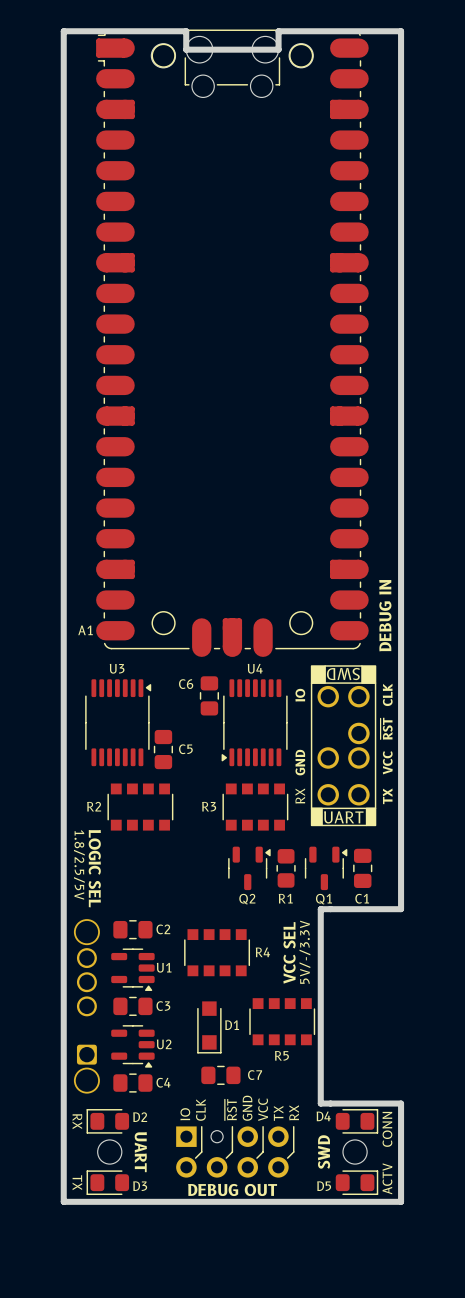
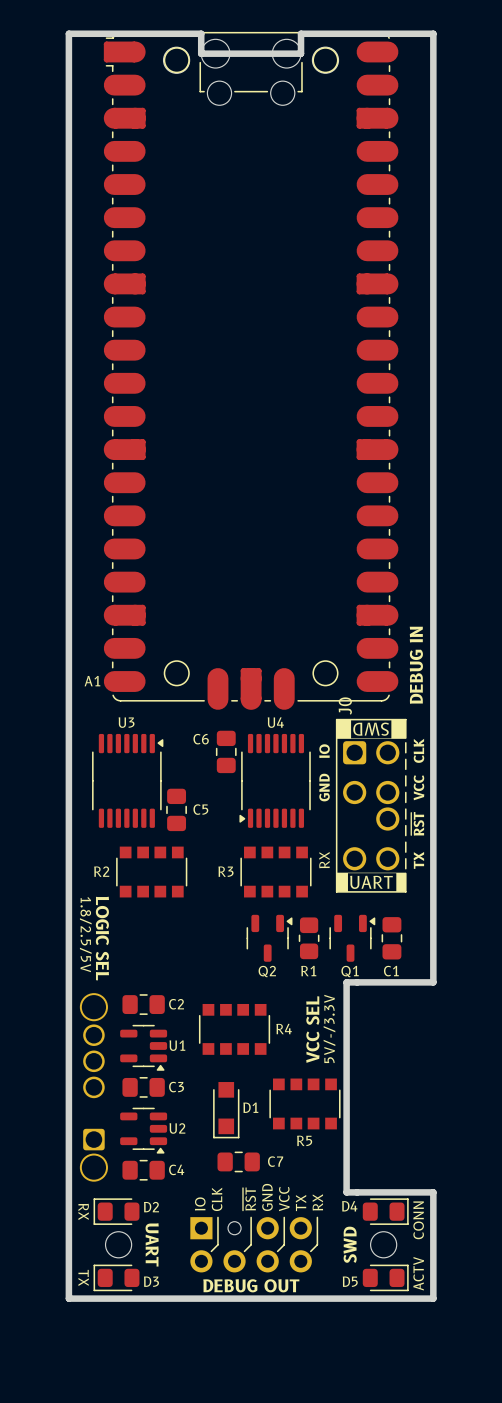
part: (343, 745) -> none
J0: none -> (371, 805)

